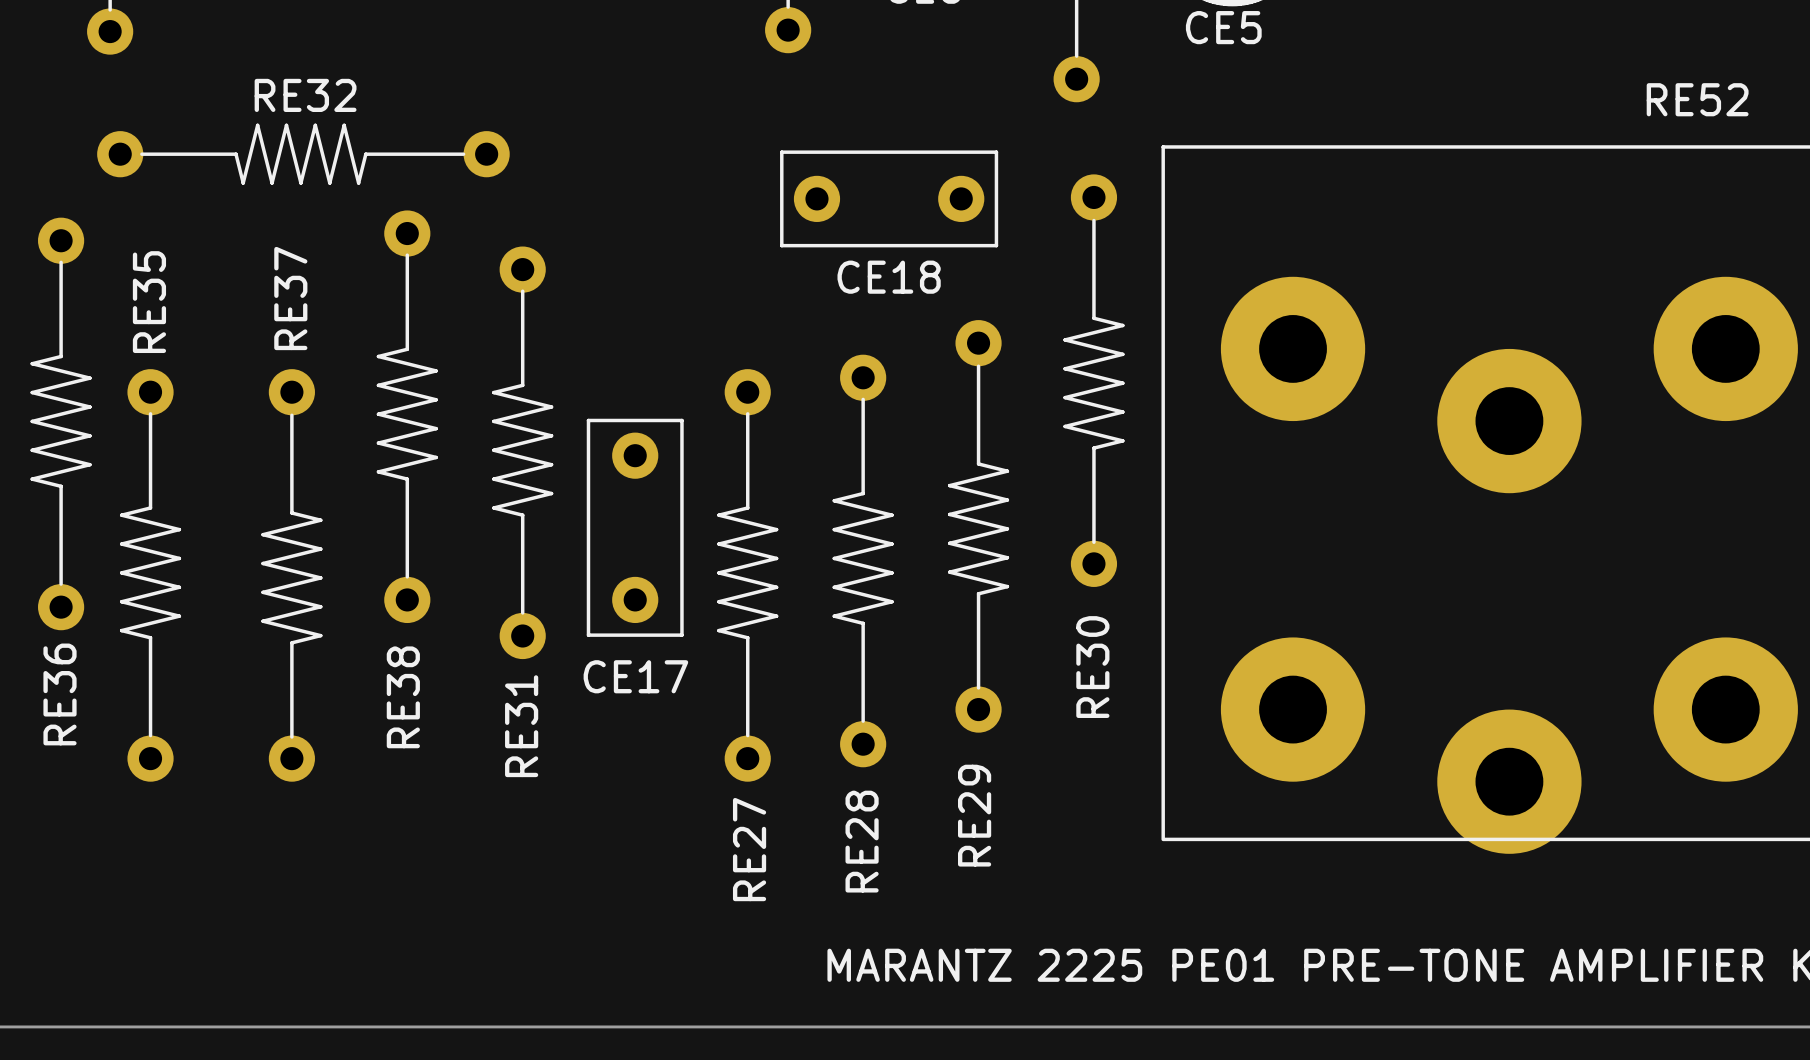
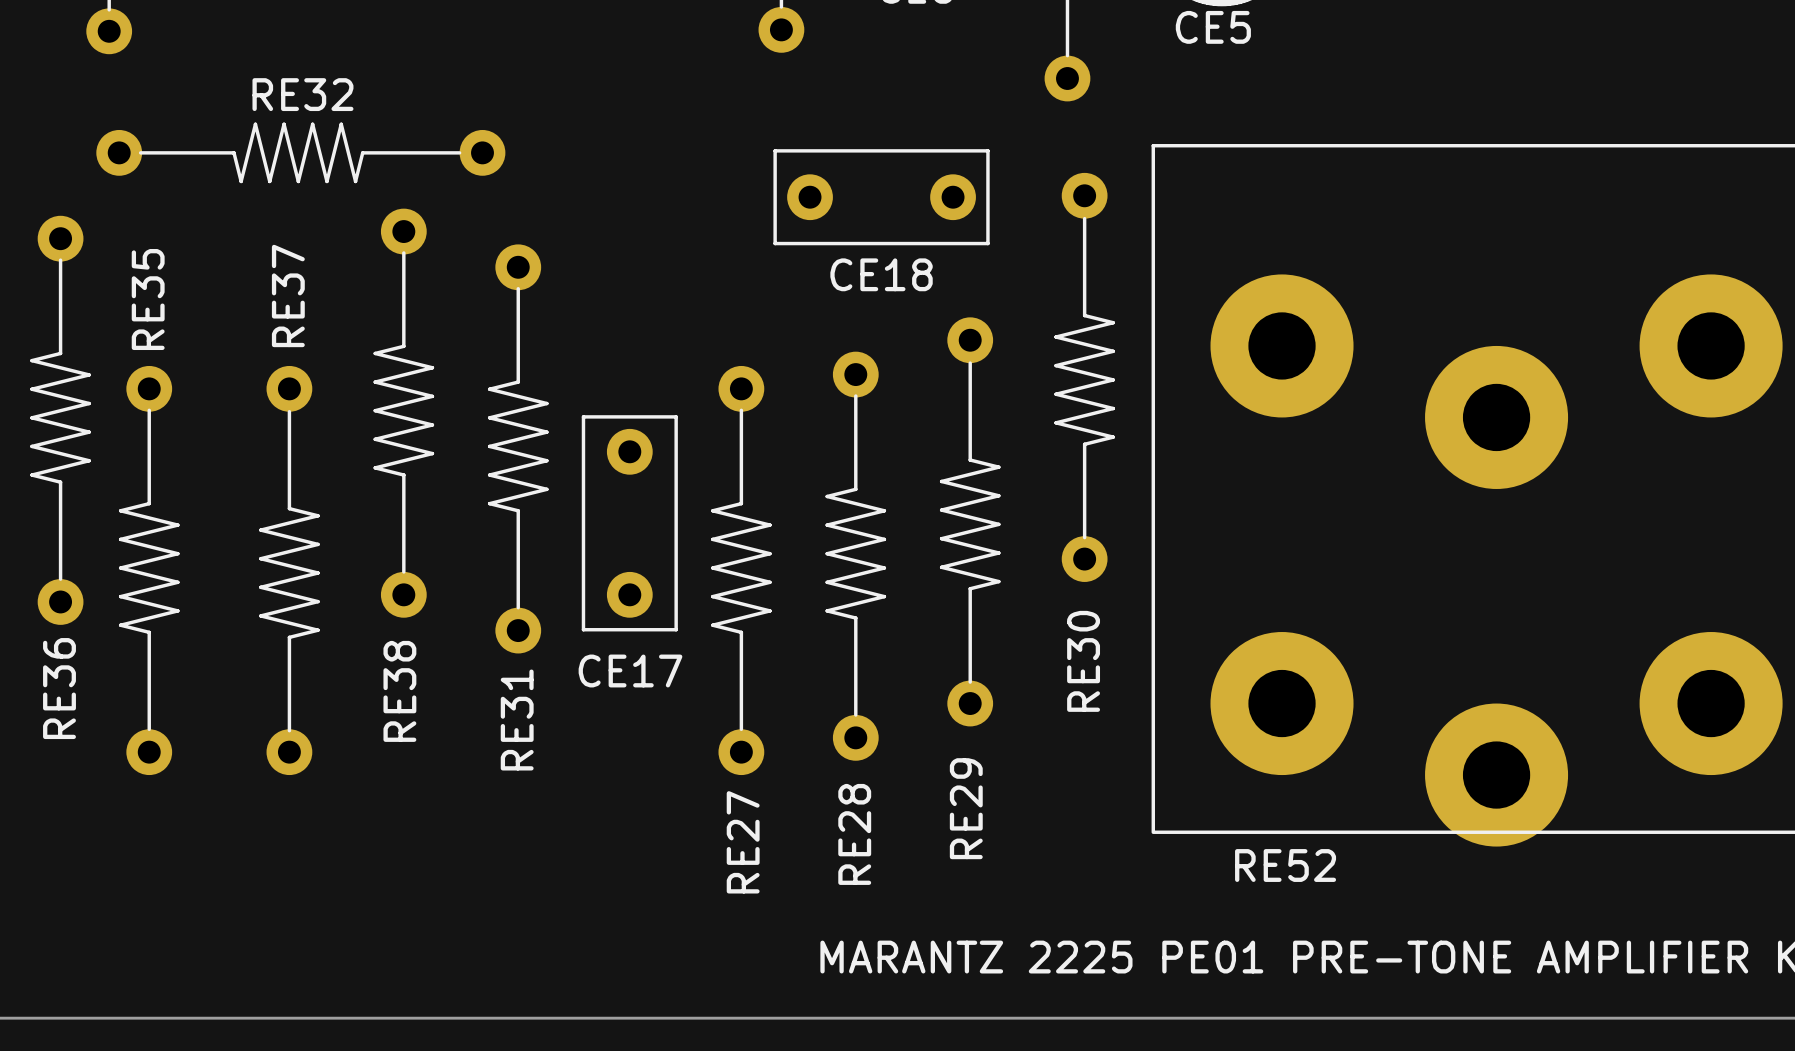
RE52 name position: RE52 (1697, 99) -> RE52 (1285, 865)

